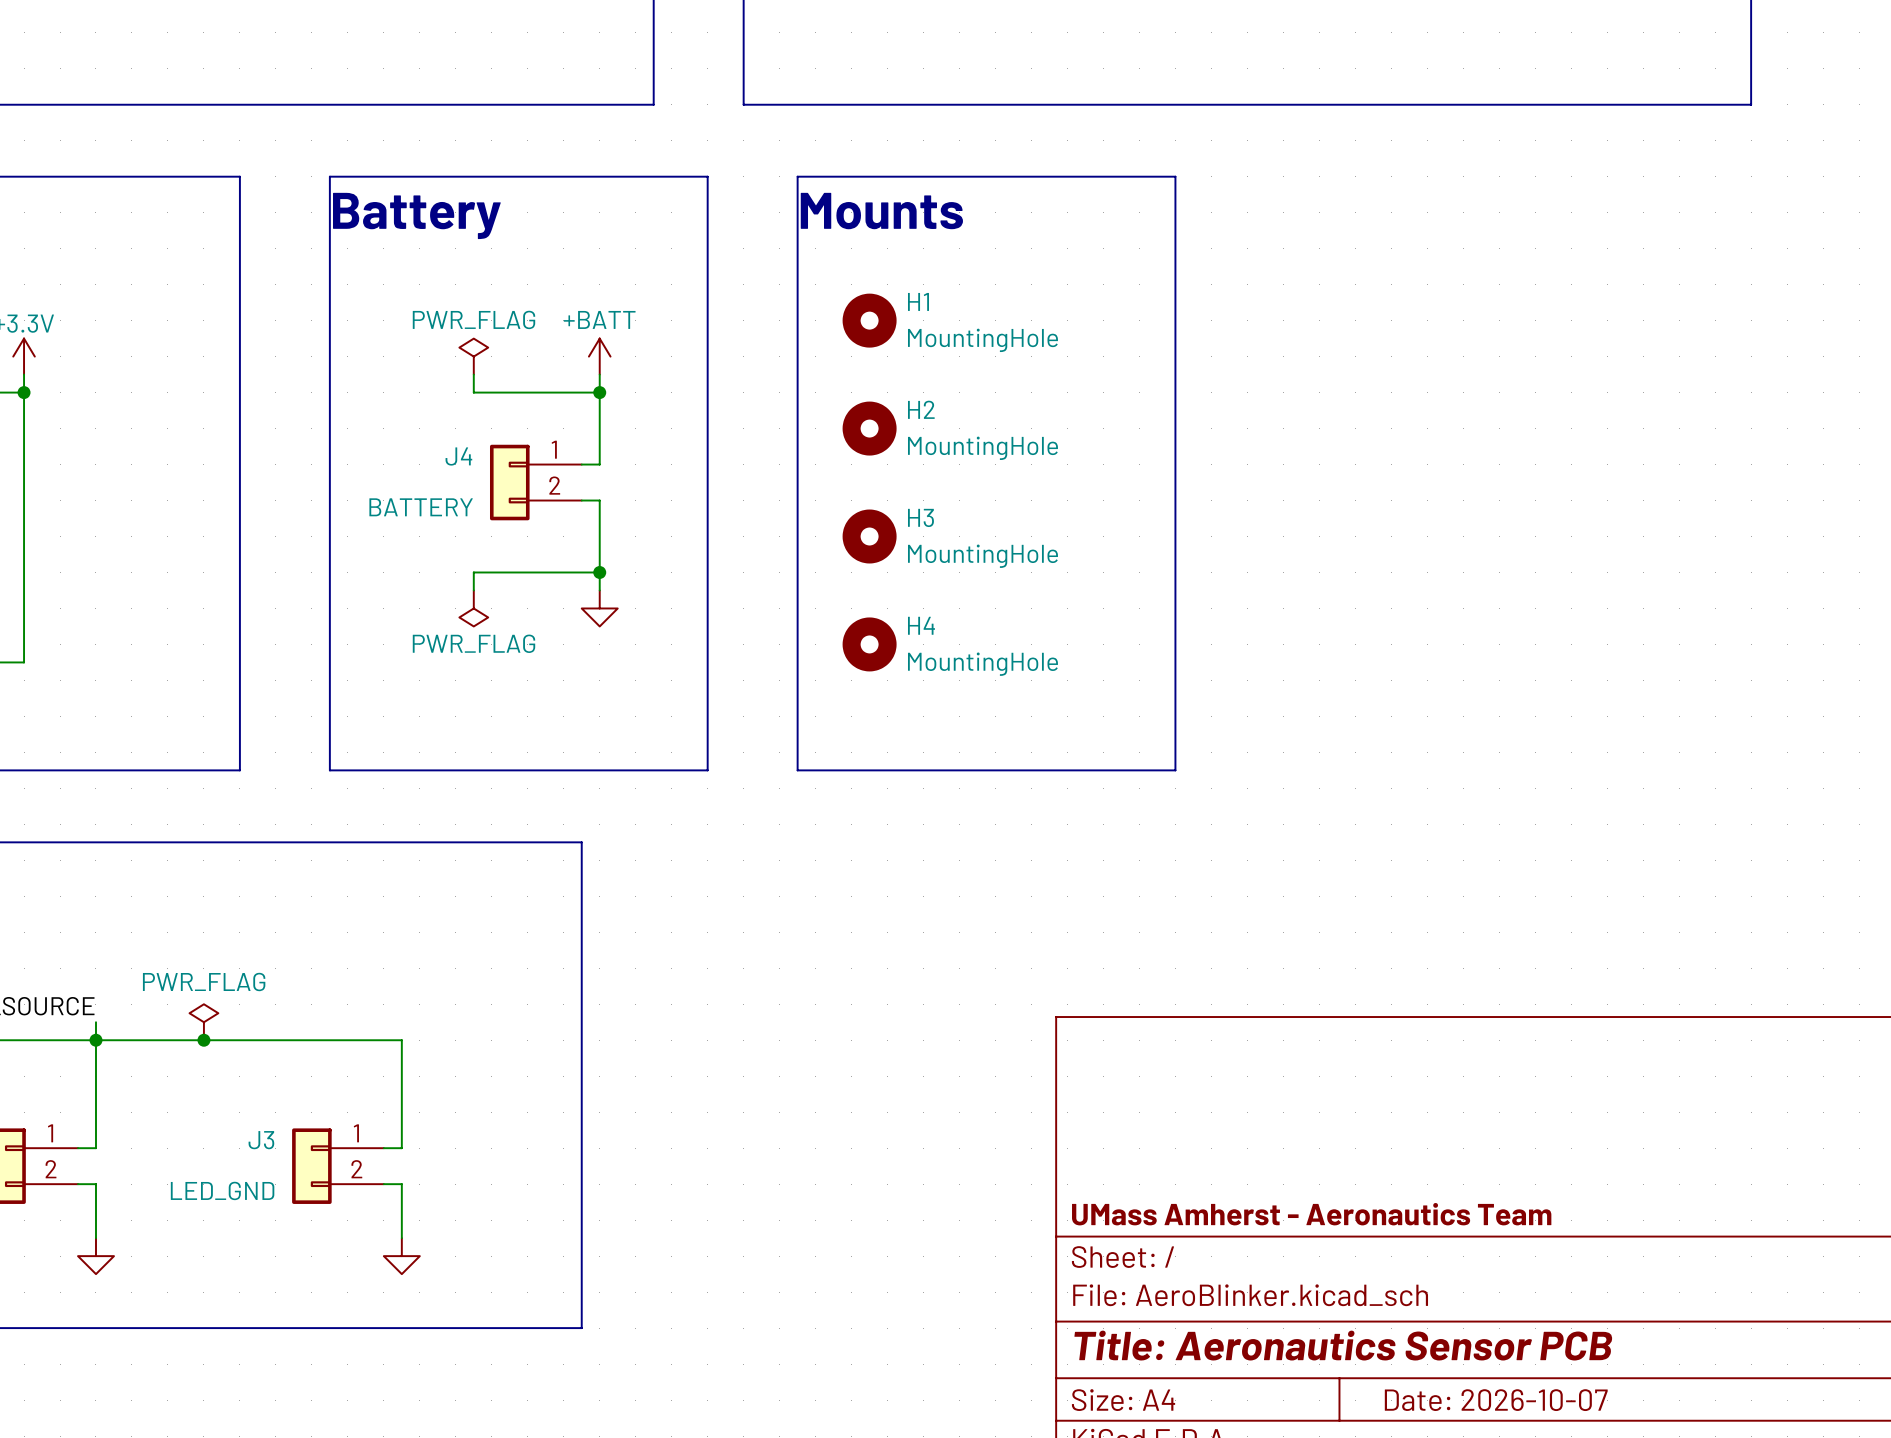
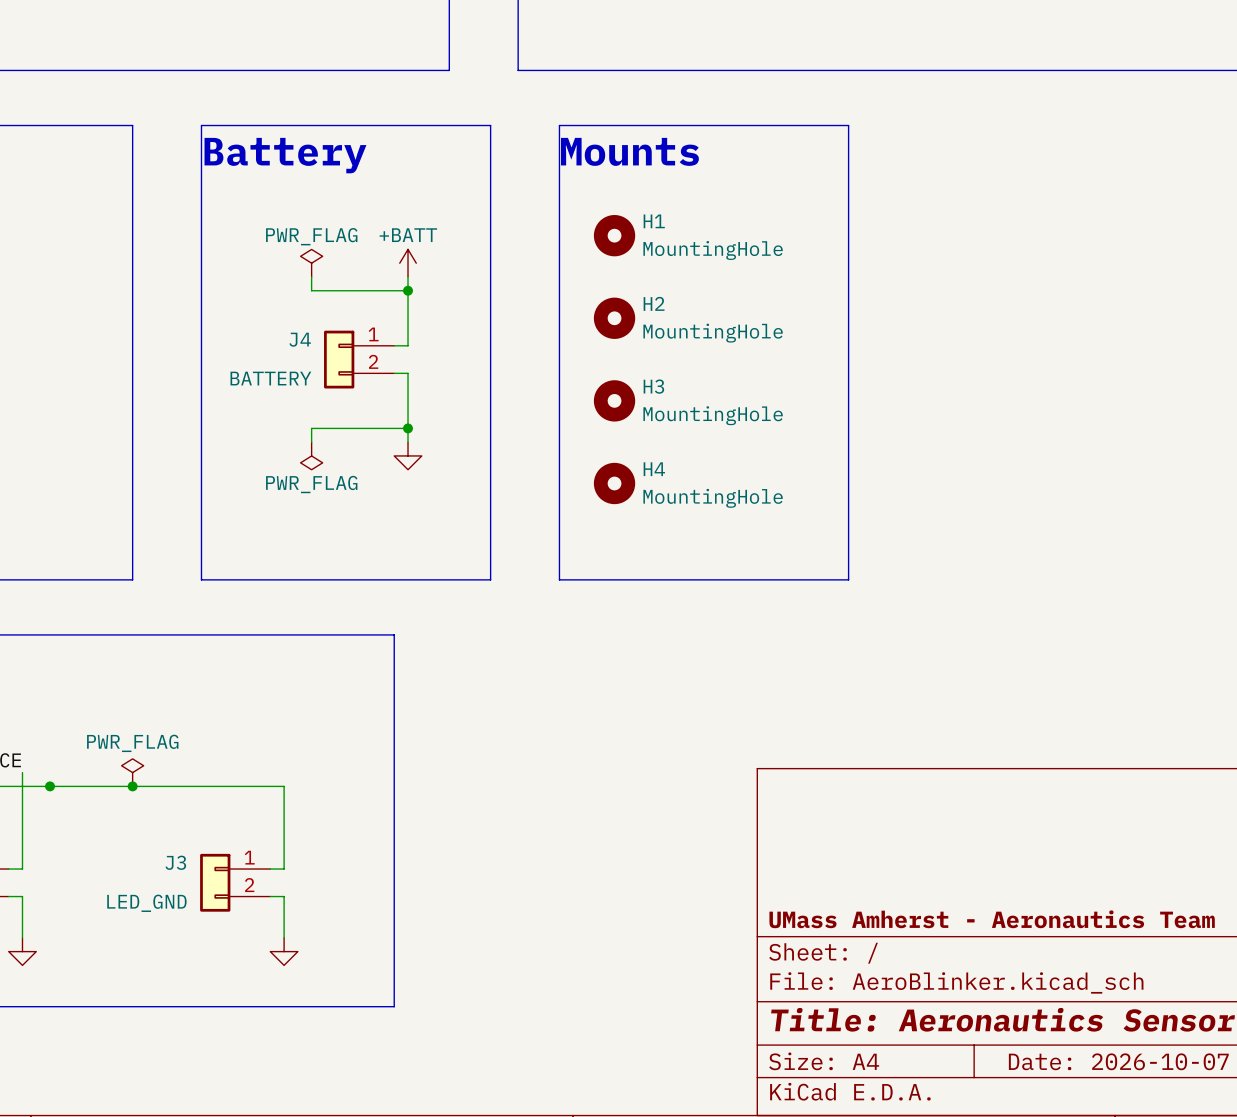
power symbol position: PWR_FLAG (203, 1022) -> PWR_FLAG (132, 772)
junction: (95, 1040) -> none
junction: none -> (50, 786)
junction: (203, 1040) -> none
junction: none -> (132, 786)
wire: (401, 1040) (401, 1148) (383, 1148) -> (256, 786) (284, 786) (284, 869) (270, 869)
J3 position: (337, 1166) -> (235, 882)
wire: (383, 1184) (401, 1184) (401, 1238) -> (270, 896) (284, 896) (284, 937)
power symbol position: (401, 1256) -> (284, 951)

